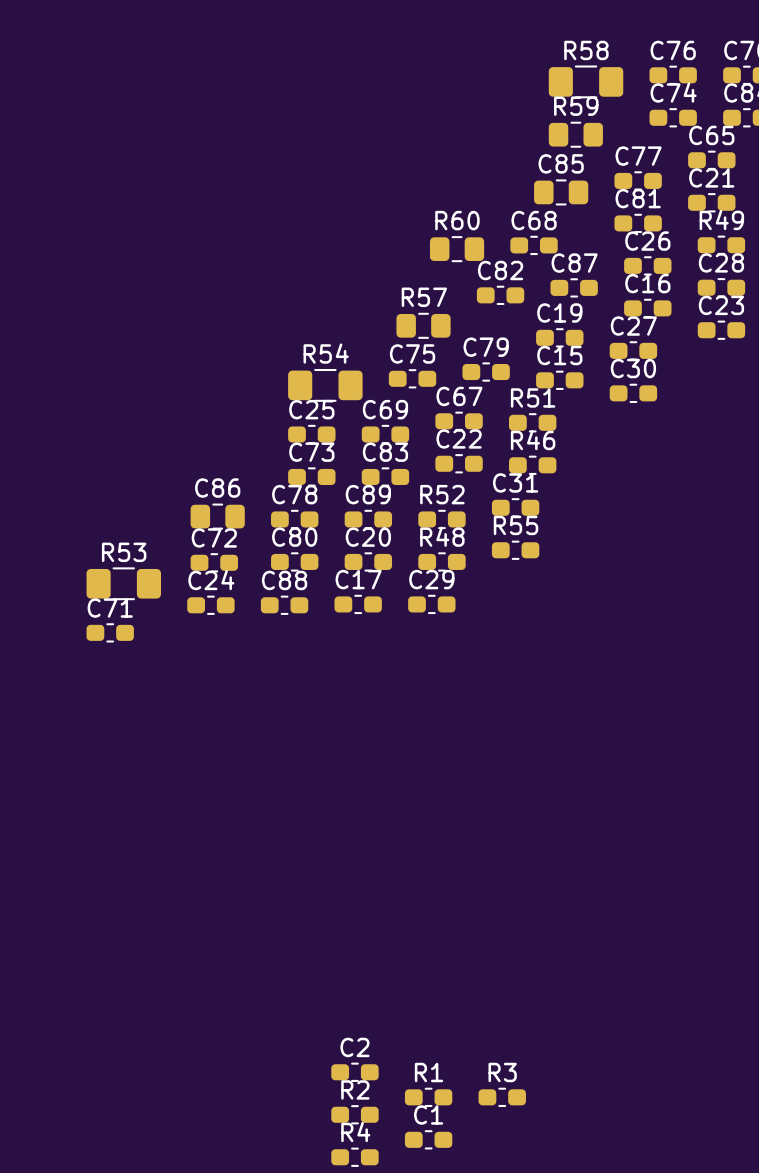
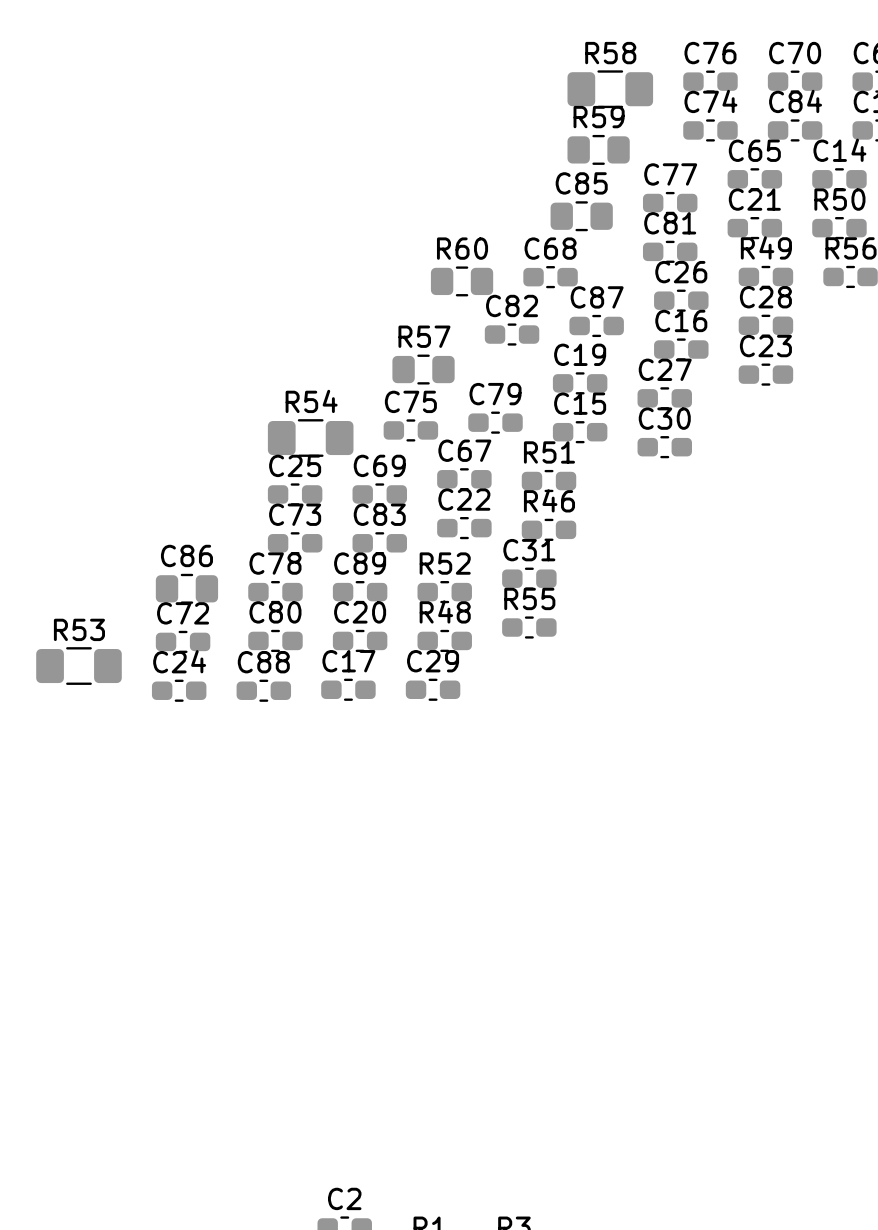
C71: (110, 632) -> none

